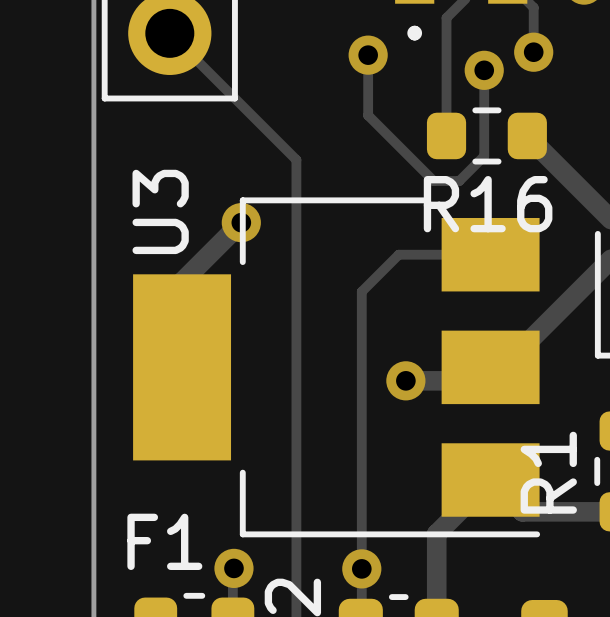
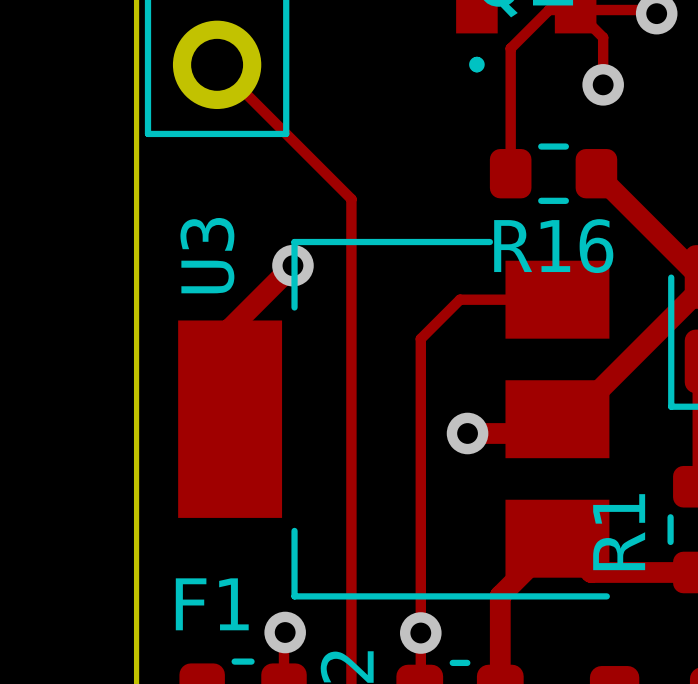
track: (368, 55) (368, 115) (433, 181) (459, 181) (484, 156) (484, 70) -> none
via: (368, 55) -> none
via: (484, 70) -> none

